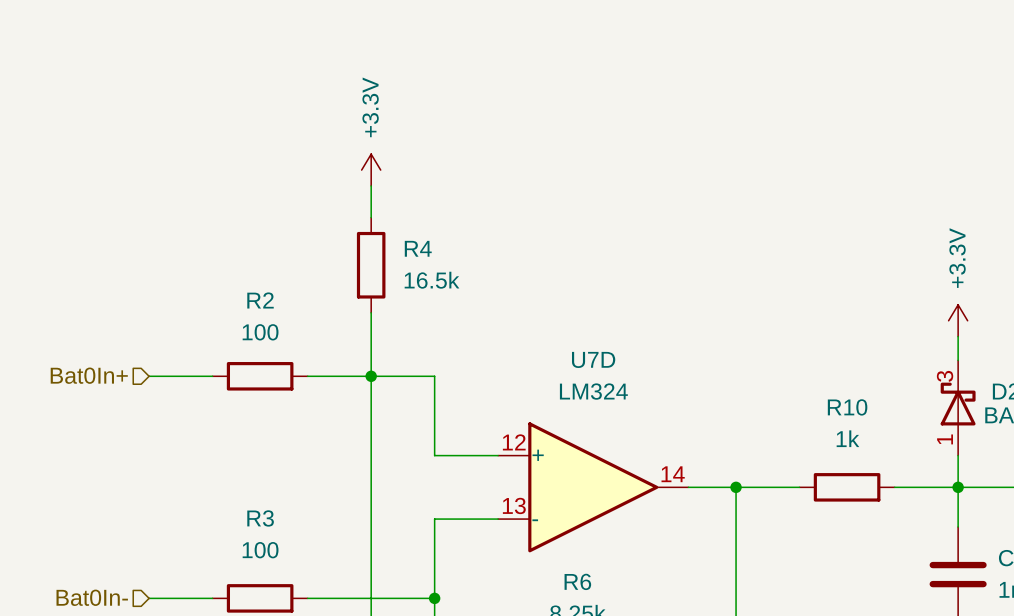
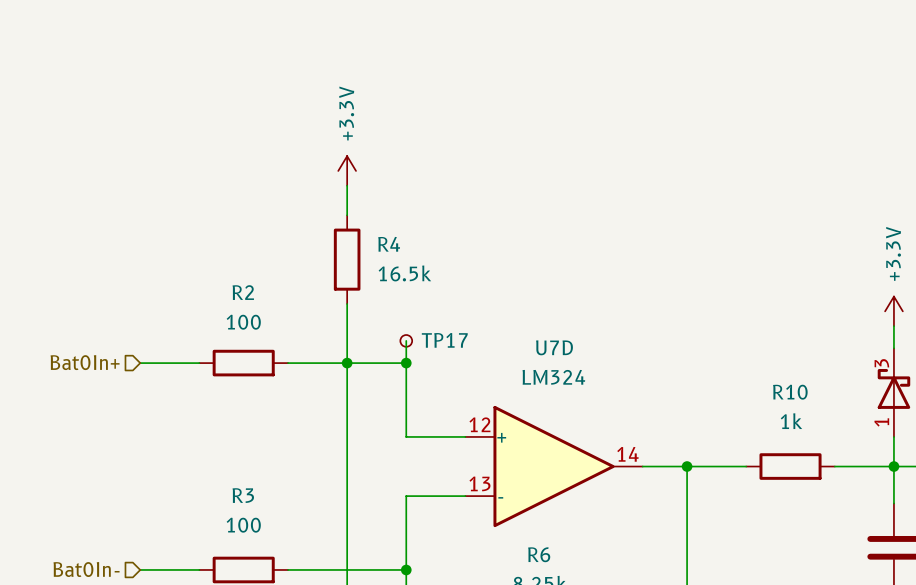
wire: none -> (406, 340) (406, 363)
TP17: none -> (406, 340)
junction: none -> (406, 363)

